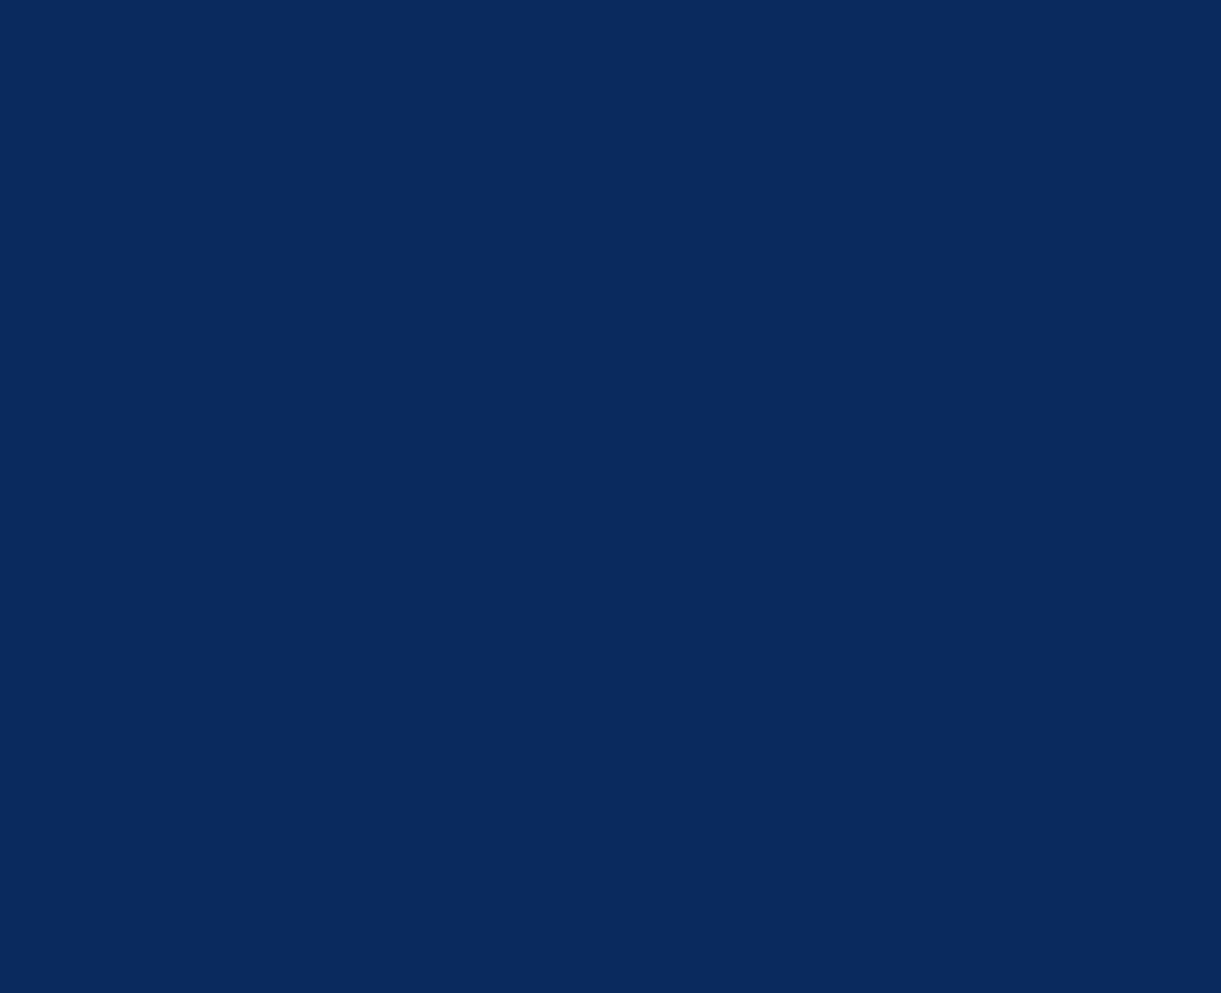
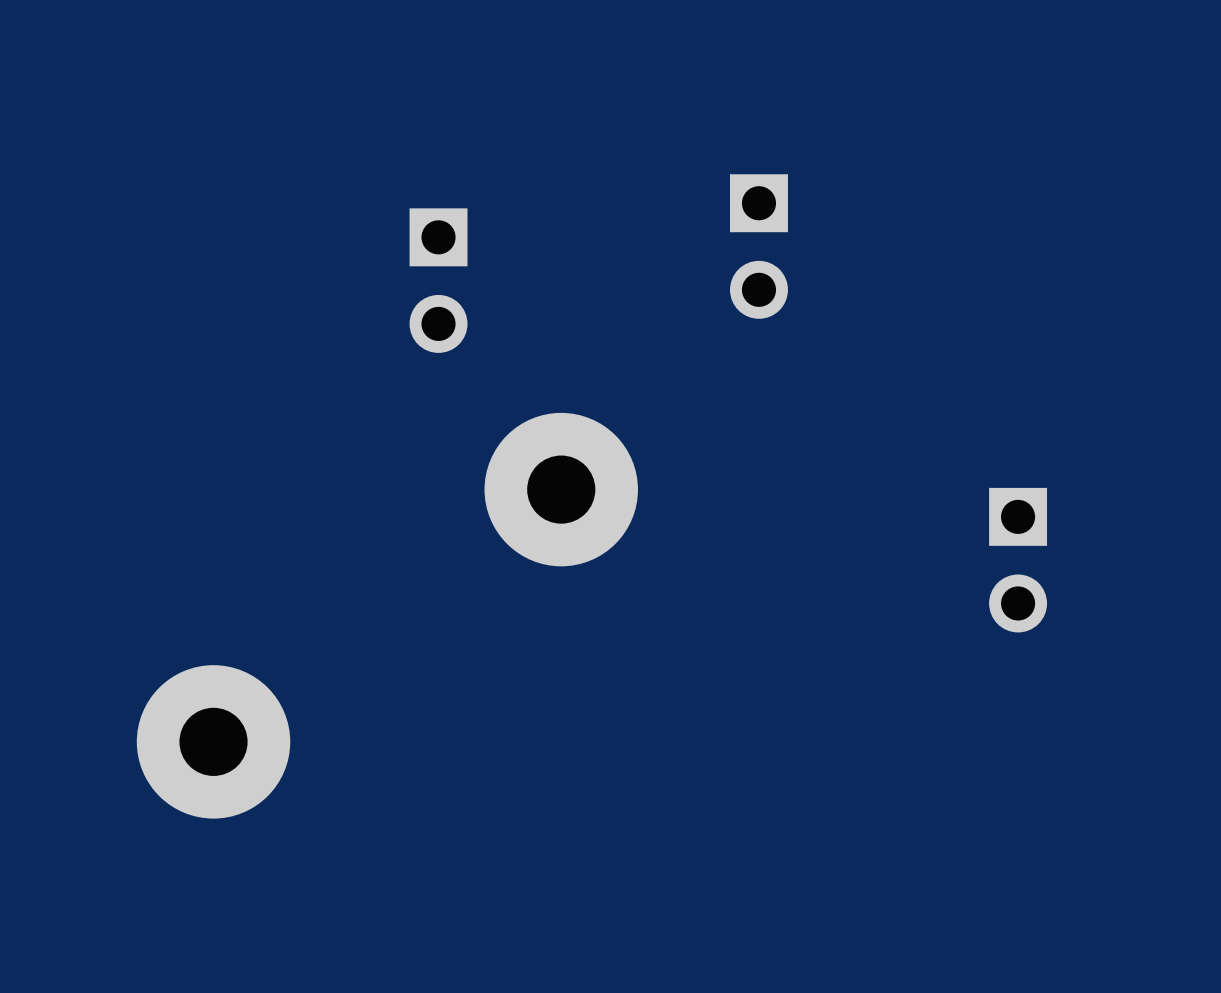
part: none -> (758, 246)
part: none -> (438, 280)
part: none -> (561, 489)
part: none -> (1018, 560)
part: none -> (213, 741)

